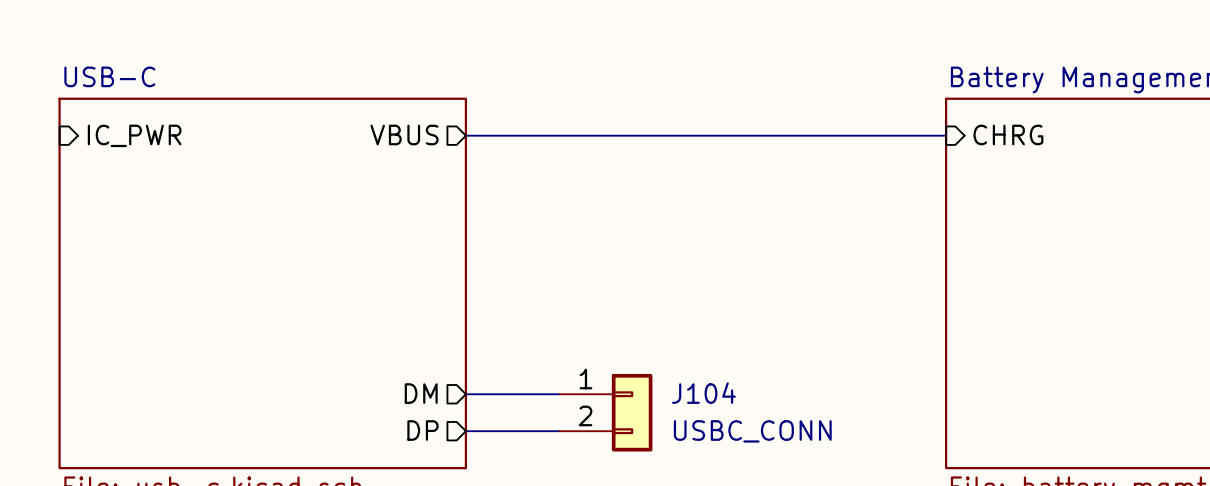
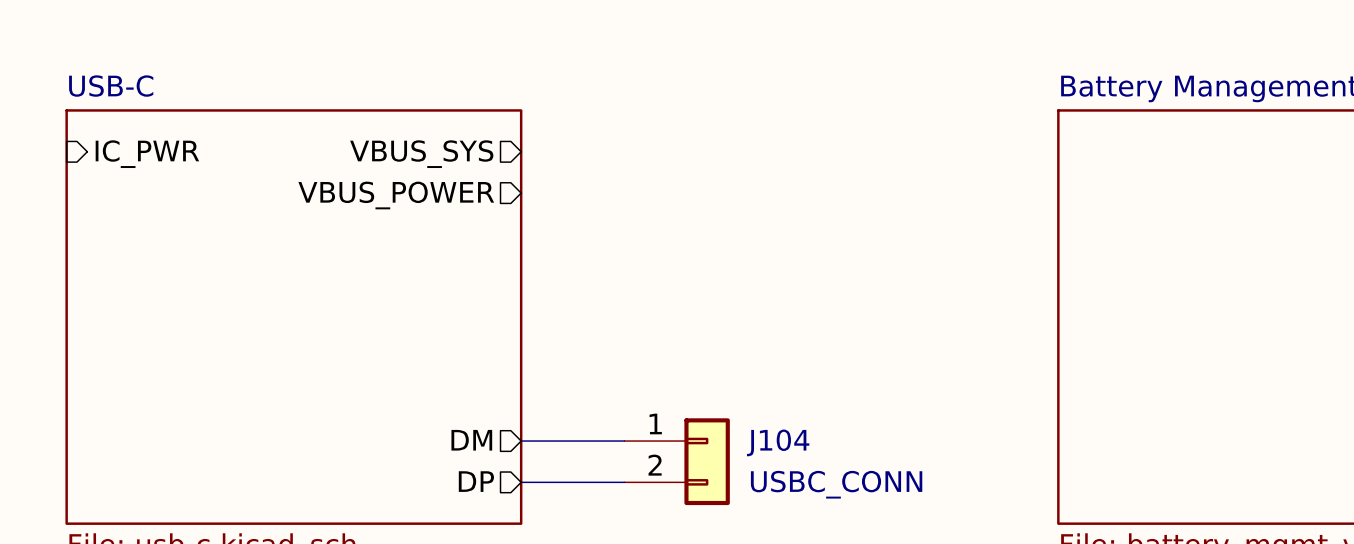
sheet pin: VBUS (404, 134) -> VBUS_SYS (421, 154)
sheet pin: CHRG (1008, 134) -> none
wire: (465, 135) (946, 135) -> none
sheet pin: none -> VBUS_POWER (396, 195)

